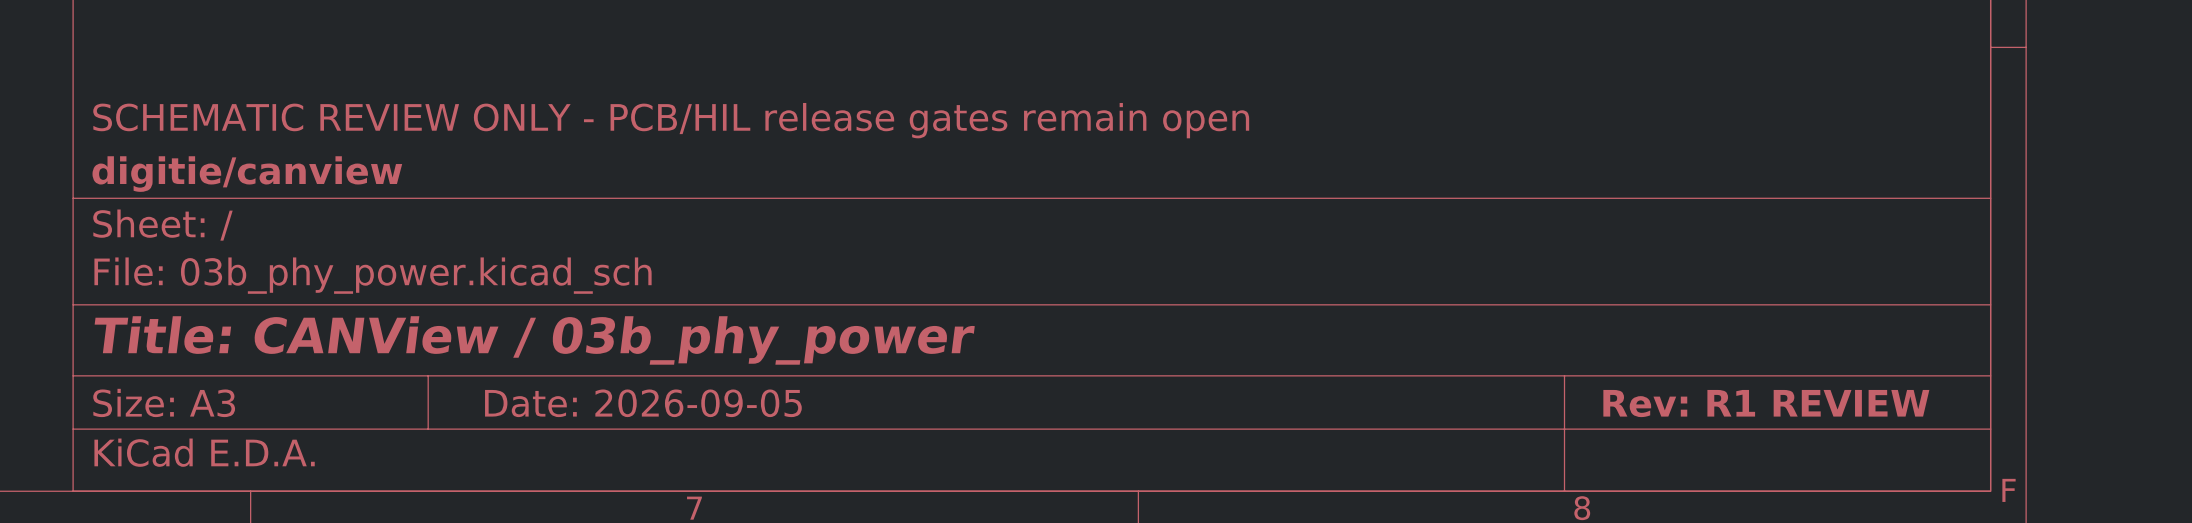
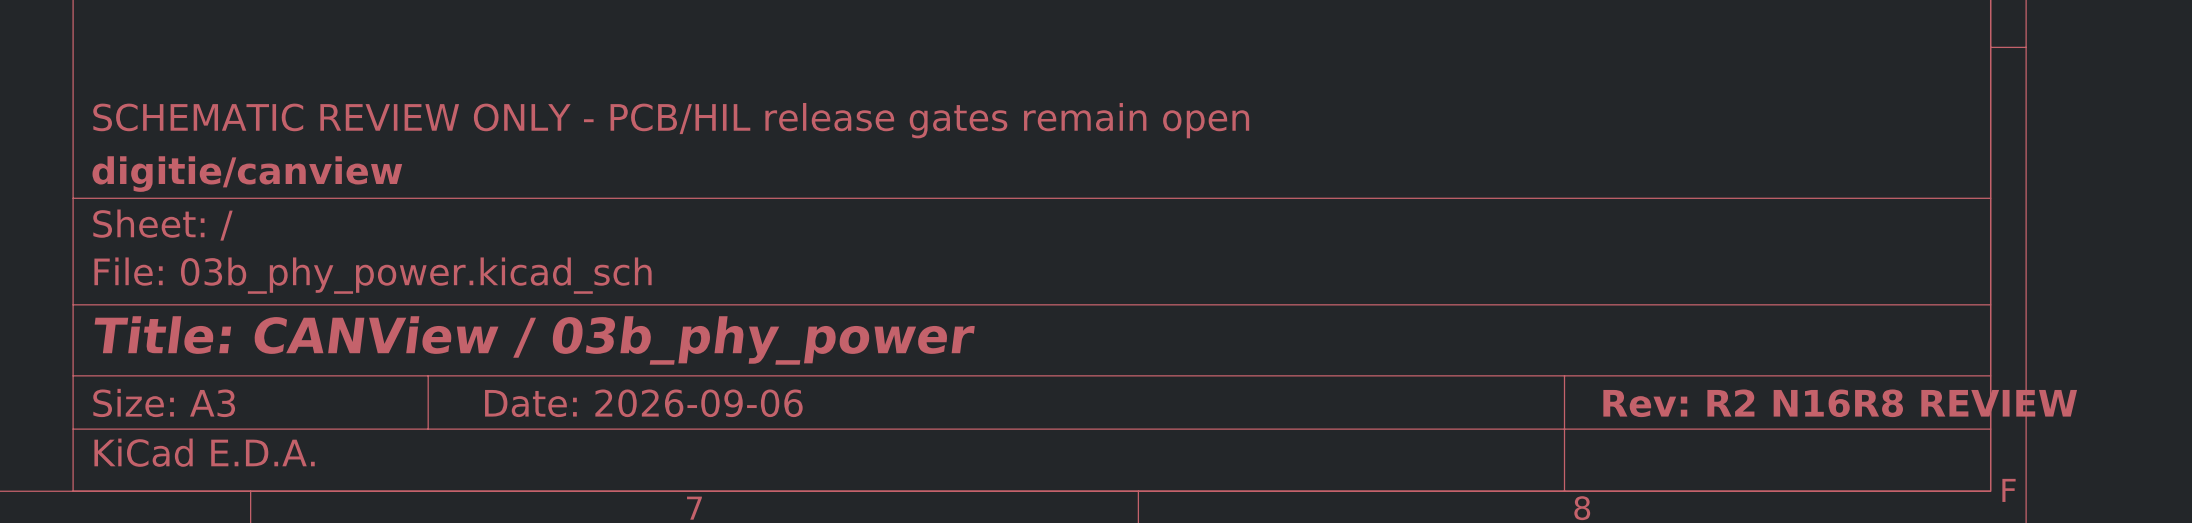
title block: Date: 2026-09-05 (643, 403) -> Date: 2026-09-06 (643, 403)
title block: Rev: R1 REVIEW (1766, 403) -> Rev: R2 N16R8 REVIEW (1840, 403)

